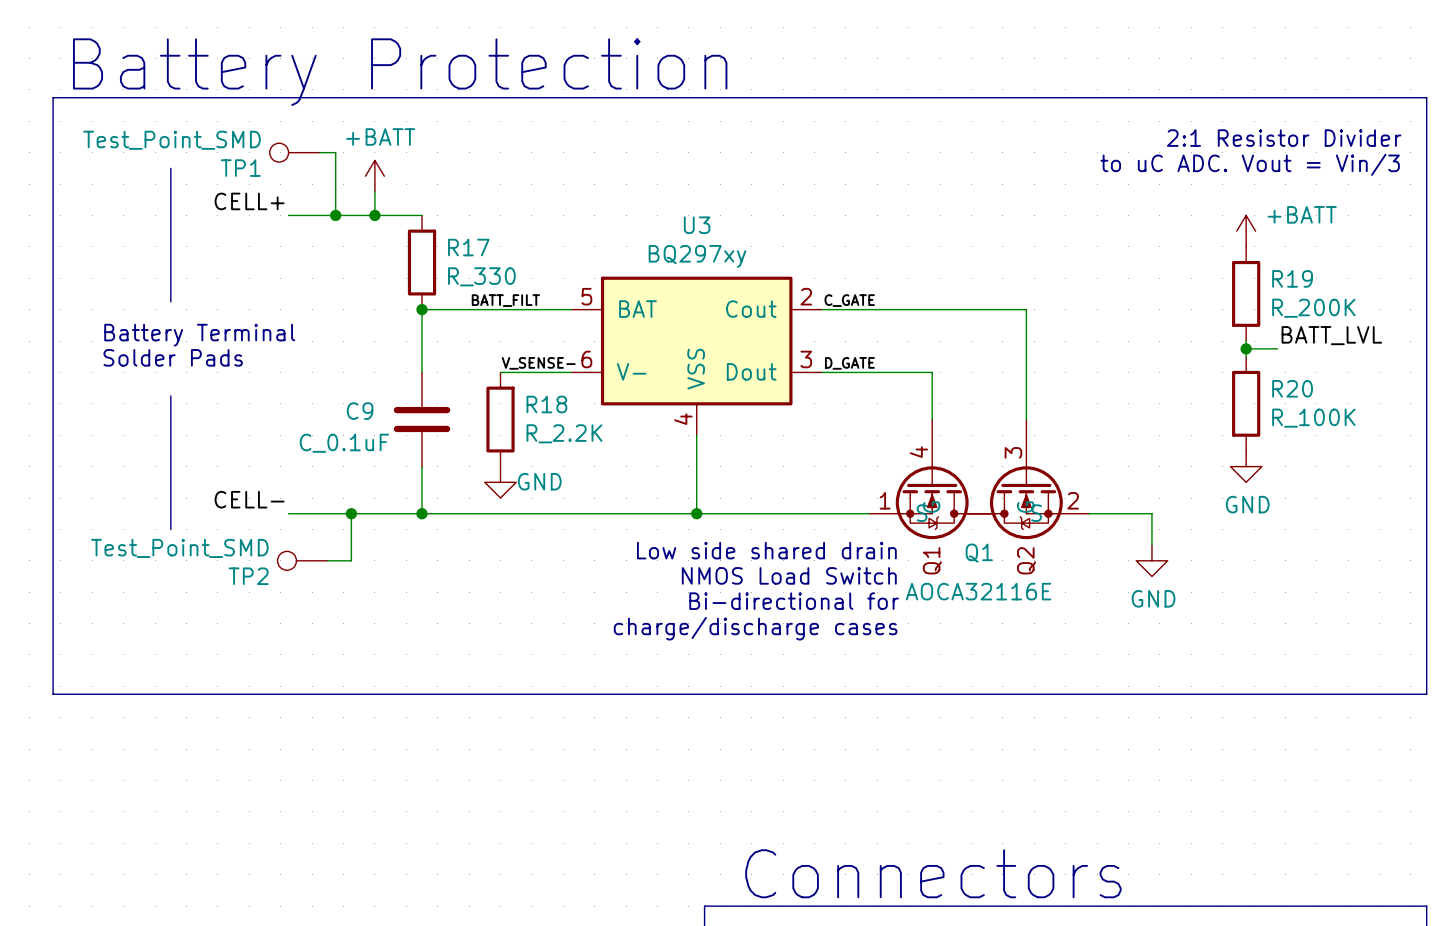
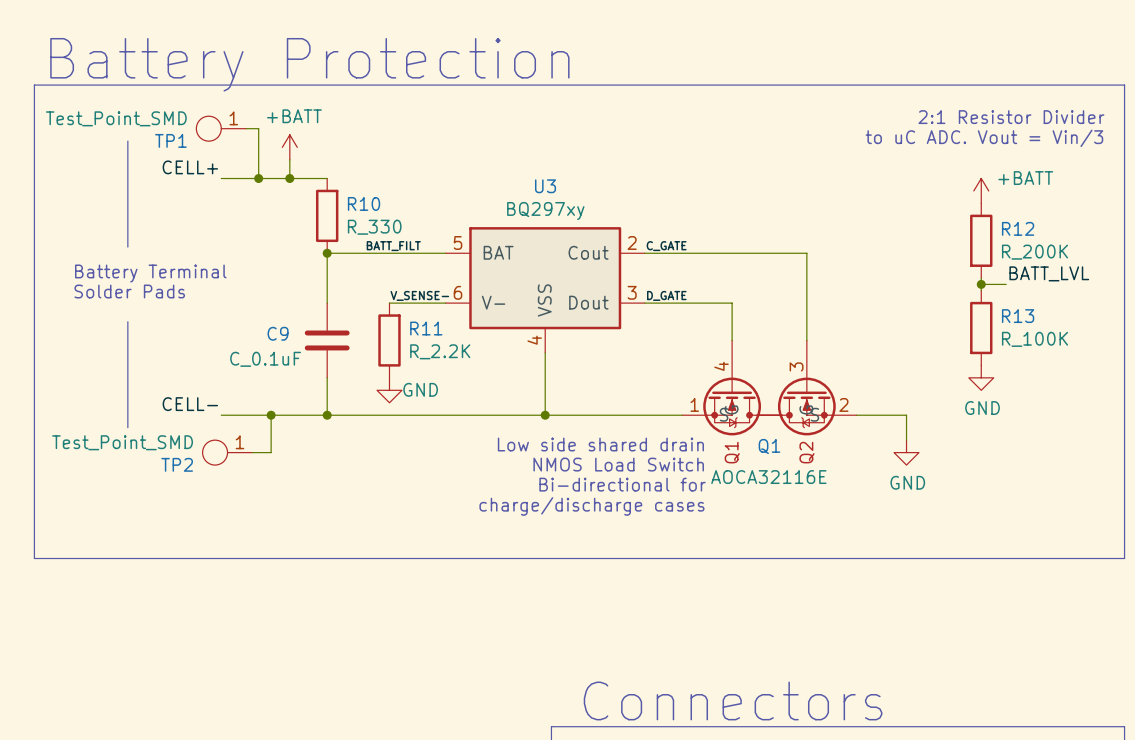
TP1 symbol: [269, 143, 320, 163] -> [196, 116, 247, 142]
R17 name: R17 (468, 247) -> R10 (364, 203)
R19 name: R19 (1292, 278) -> R12 (1018, 228)
R20 name: R20 (1292, 388) -> R13 (1018, 316)
R18 name: R18 (546, 404) -> R11 (426, 328)
TP2 symbol: [277, 551, 328, 571] -> [202, 440, 253, 466]

